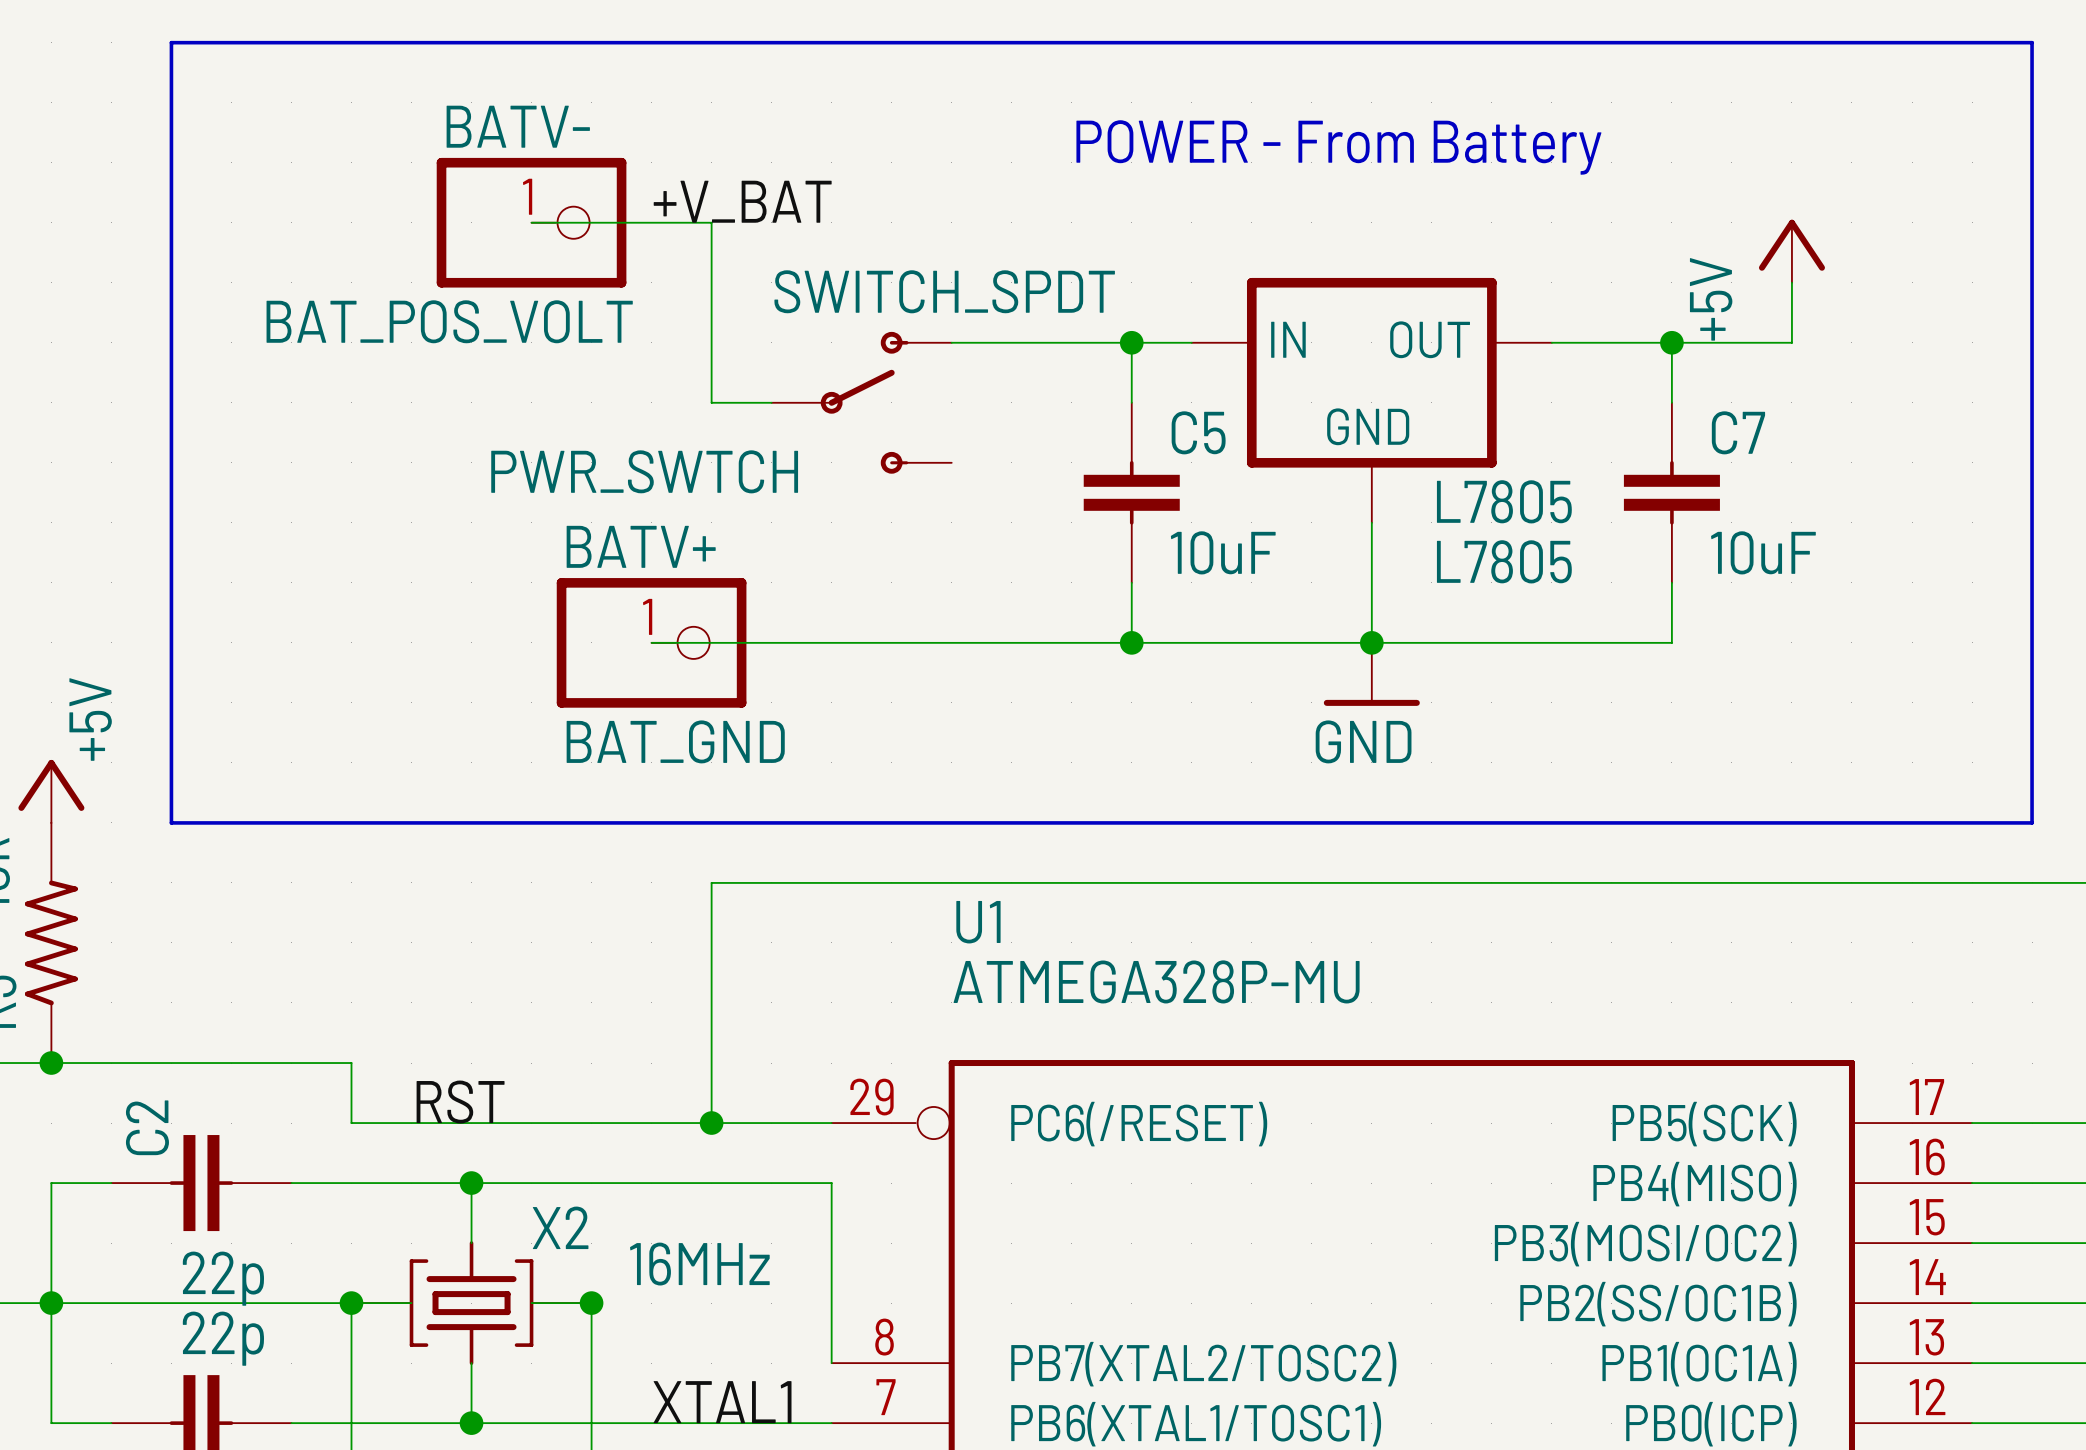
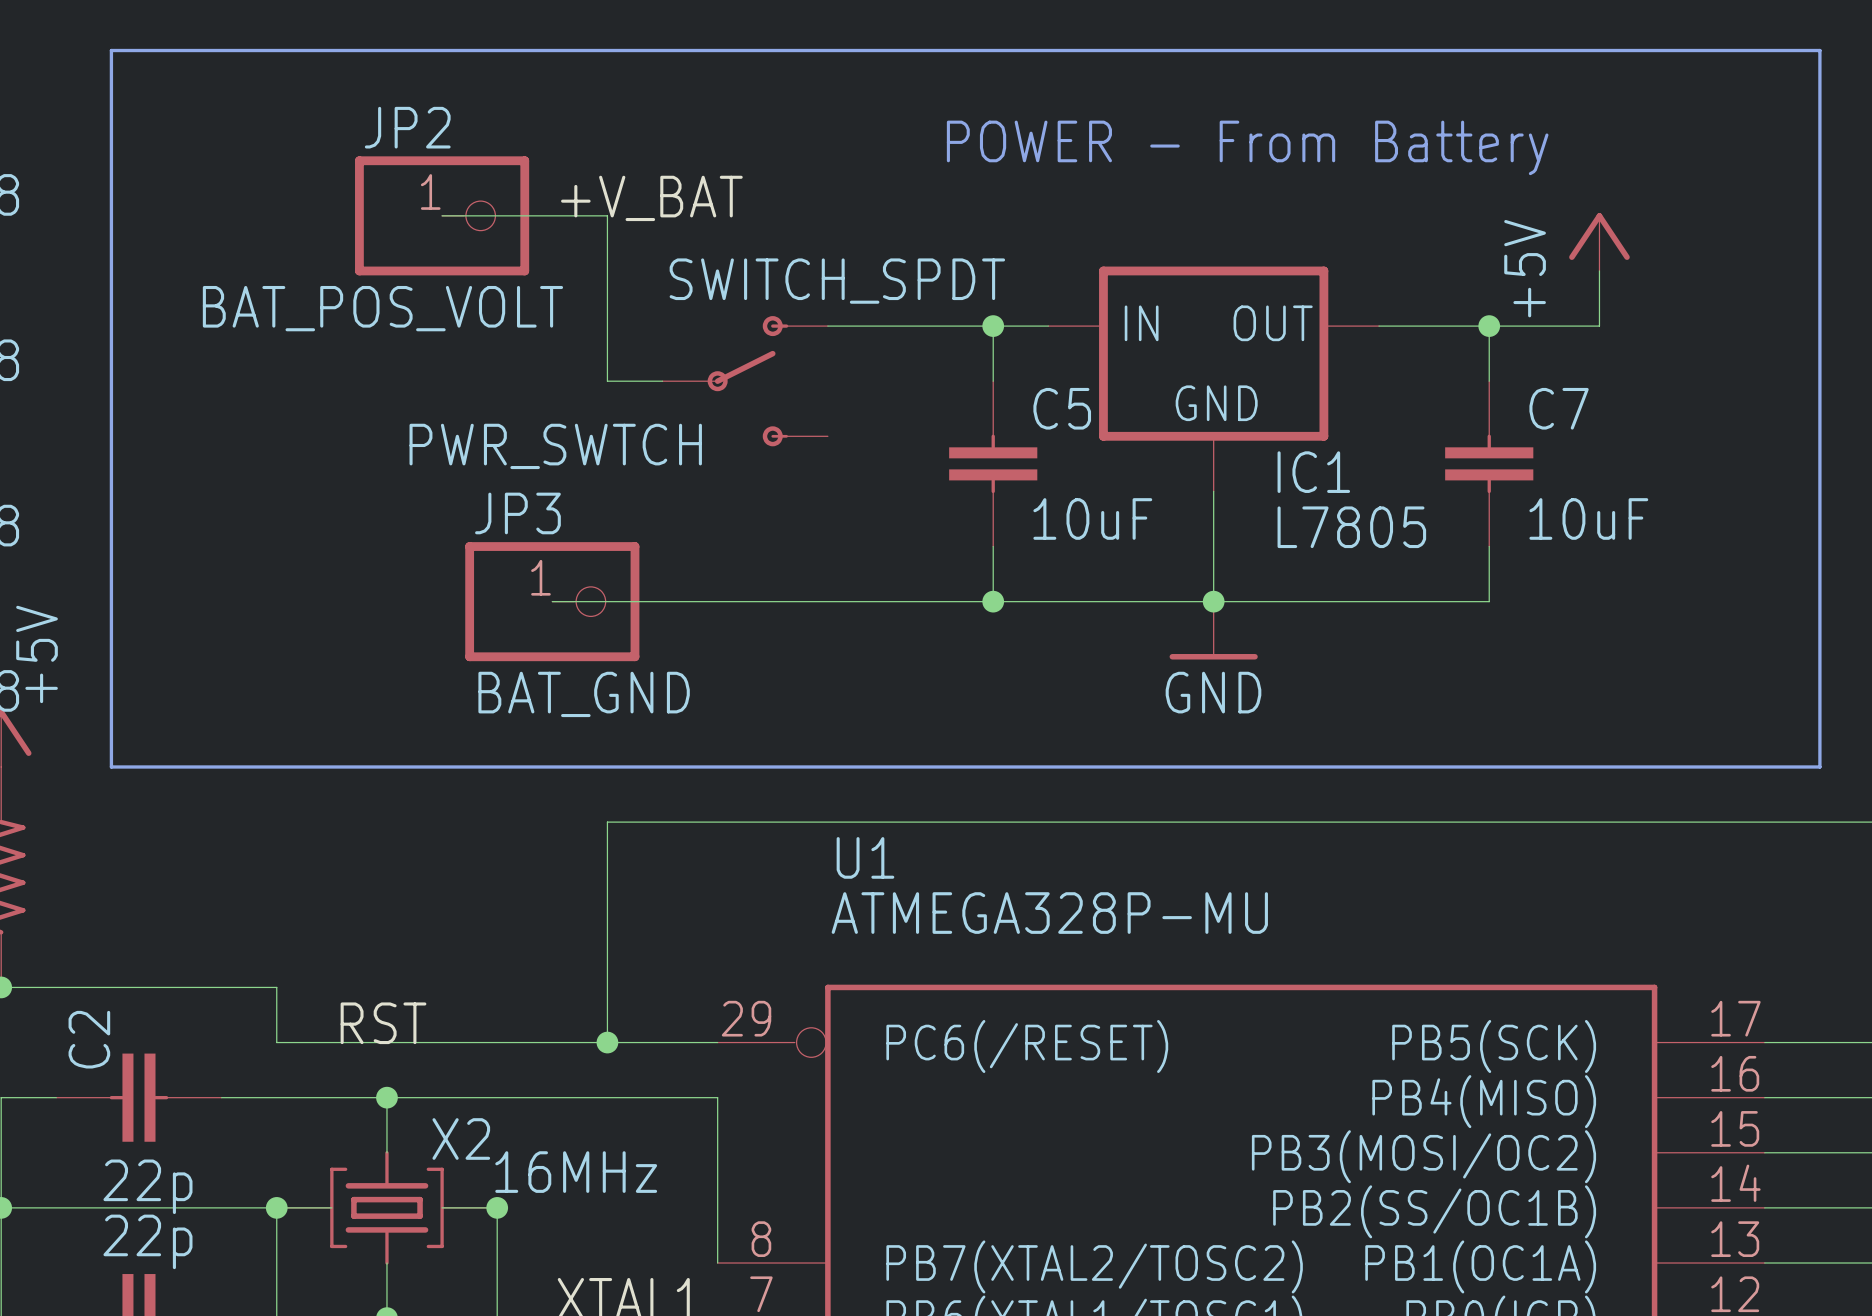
BATV- name: BATV- (518, 126) -> JP2 (407, 127)
L7805 name: L7805 (1504, 501) -> IC1 (1313, 472)
BATV+ name: BATV+ (641, 546) -> JP3 (517, 513)

